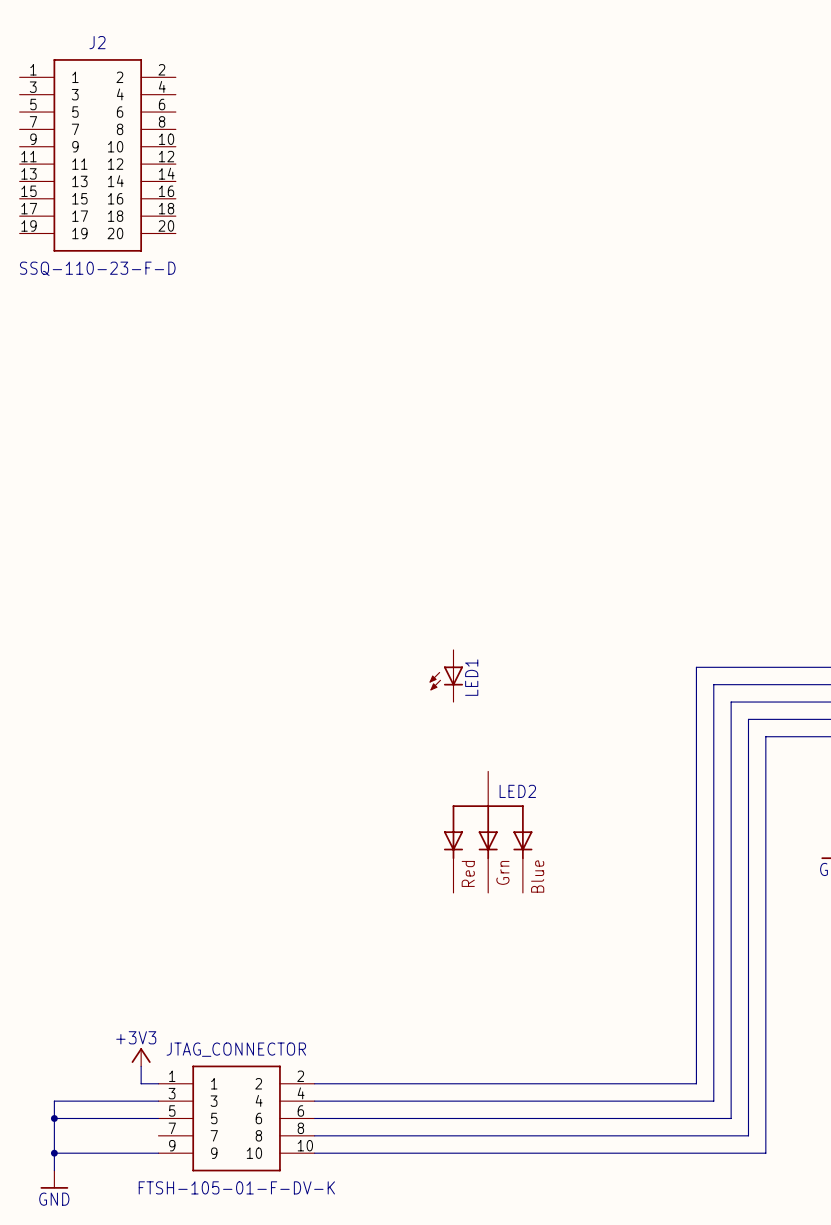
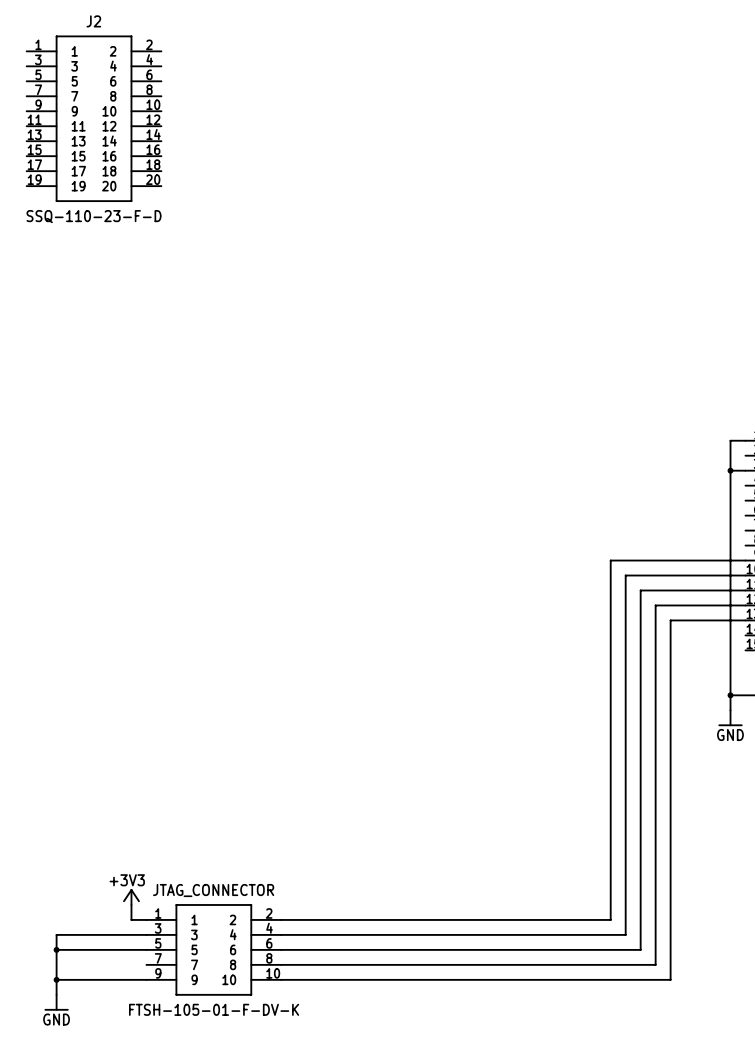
LED1: (446, 675) -> none
LED2: (488, 832) -> none

